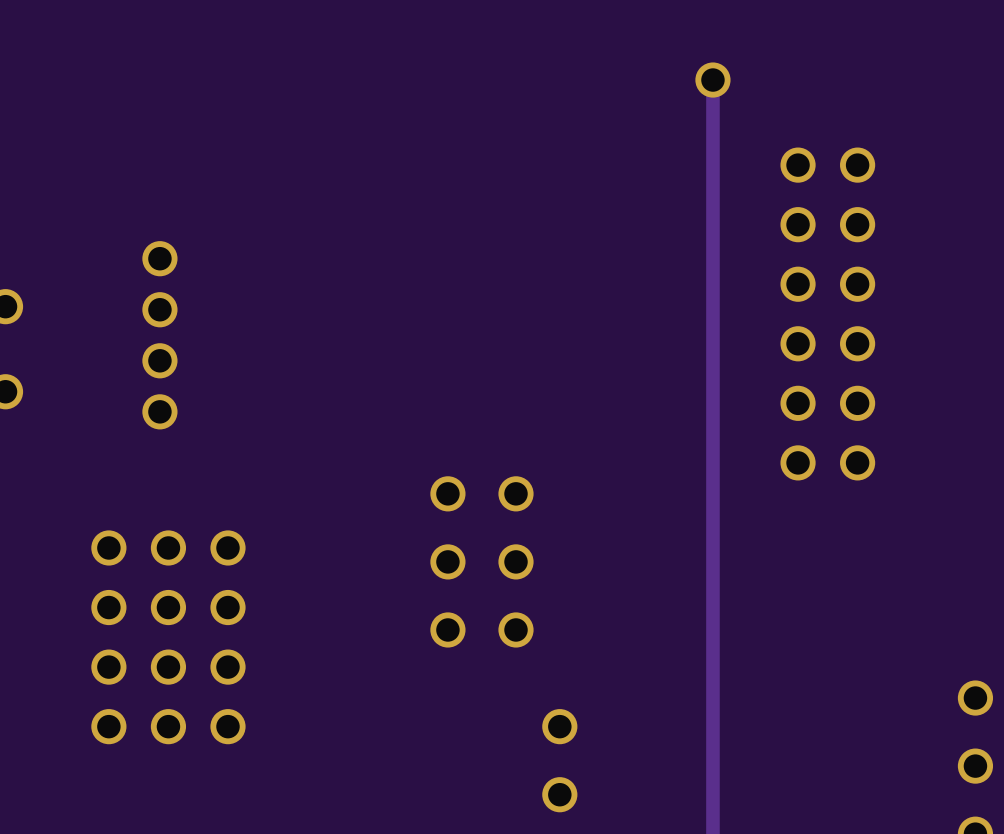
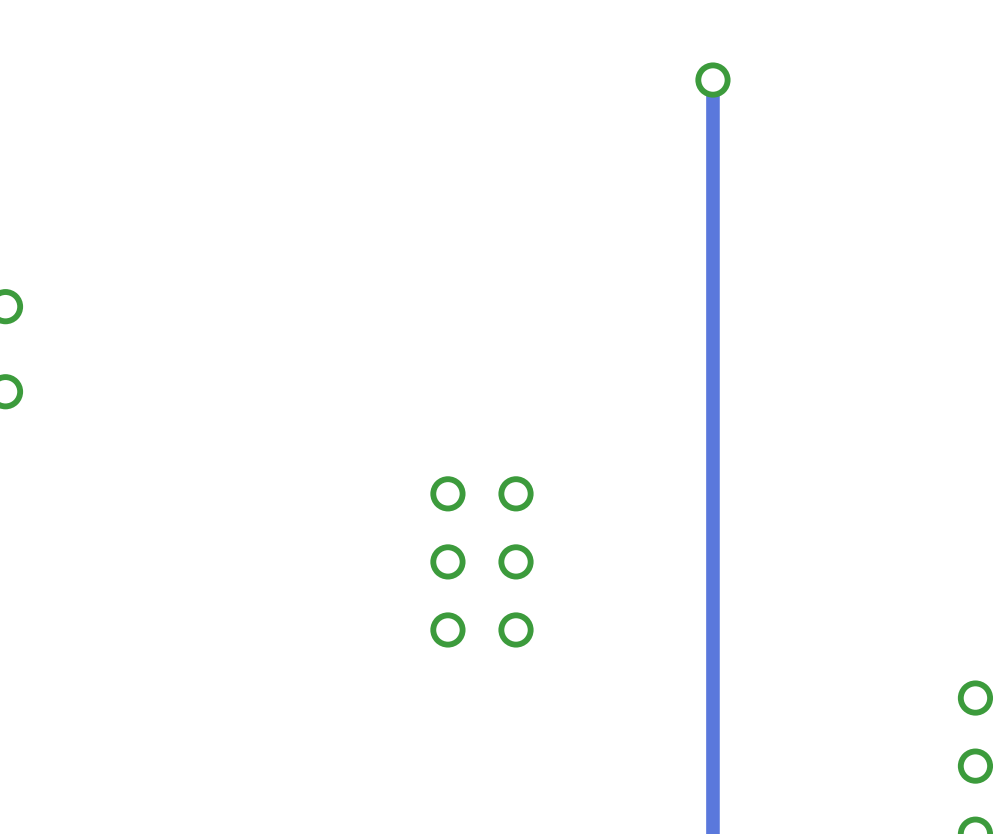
via: (798, 165) -> none
via: (857, 165) -> none
via: (798, 224) -> none
via: (857, 224) -> none
via: (159, 258) -> none
via: (798, 284) -> none
via: (857, 284) -> none
via: (159, 309) -> none
via: (798, 343) -> none
via: (857, 343) -> none
via: (159, 360) -> none
via: (798, 403) -> none
via: (857, 403) -> none
via: (159, 411) -> none
via: (798, 462) -> none
via: (857, 462) -> none
via: (108, 547) -> none
via: (168, 547) -> none
via: (228, 547) -> none
via: (108, 607) -> none
via: (168, 607) -> none
via: (228, 607) -> none
via: (108, 667) -> none
via: (168, 667) -> none
via: (228, 667) -> none
via: (108, 726) -> none
via: (168, 726) -> none
via: (228, 726) -> none
via: (559, 726) -> none
via: (559, 794) -> none

